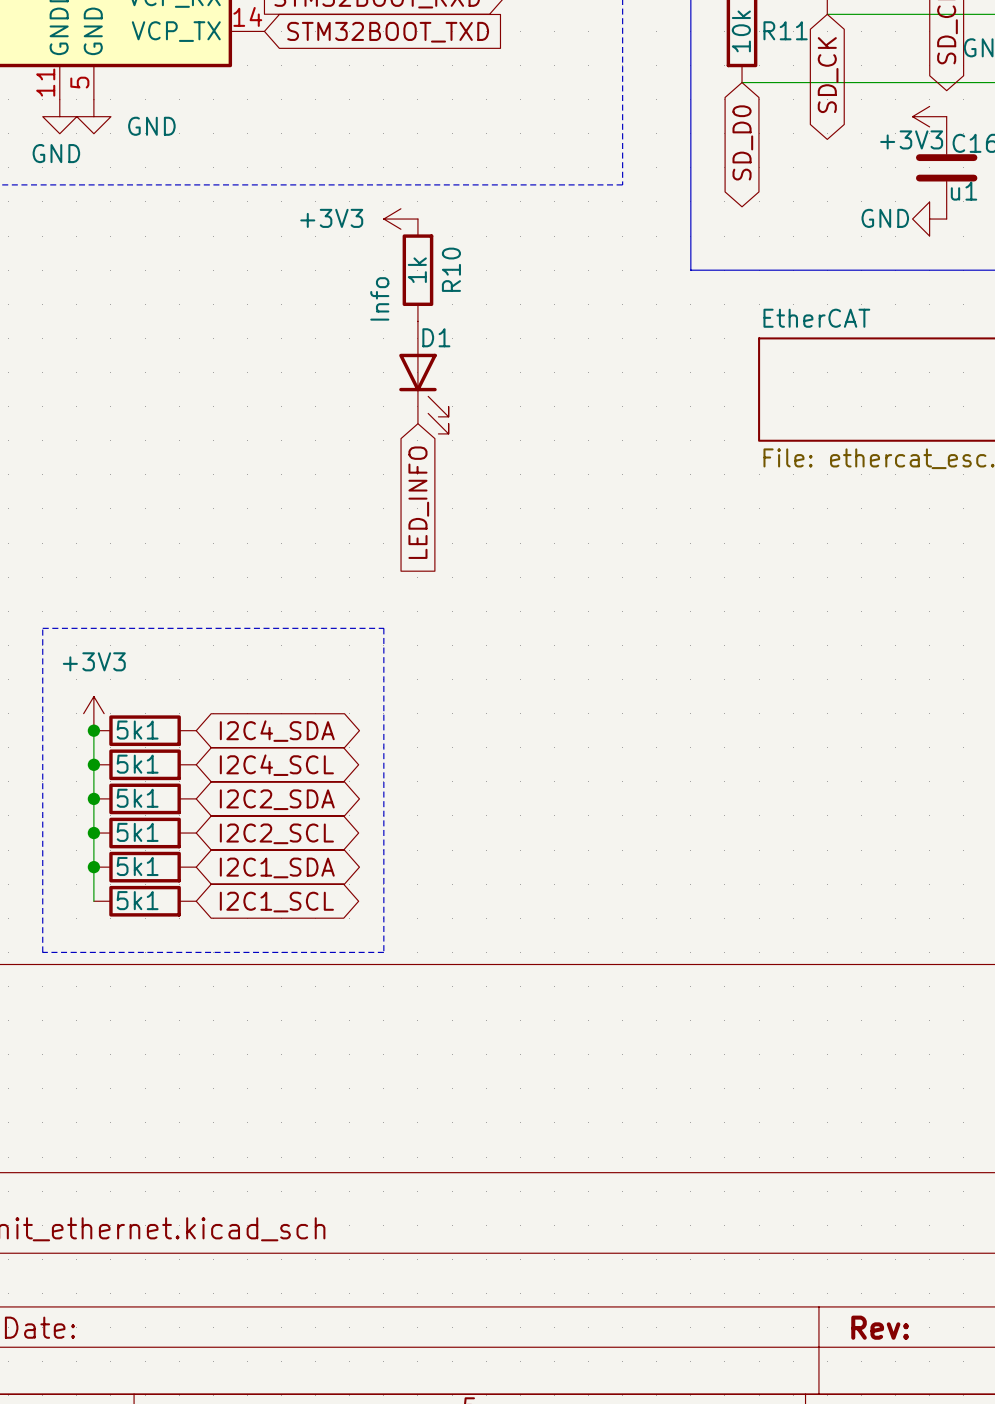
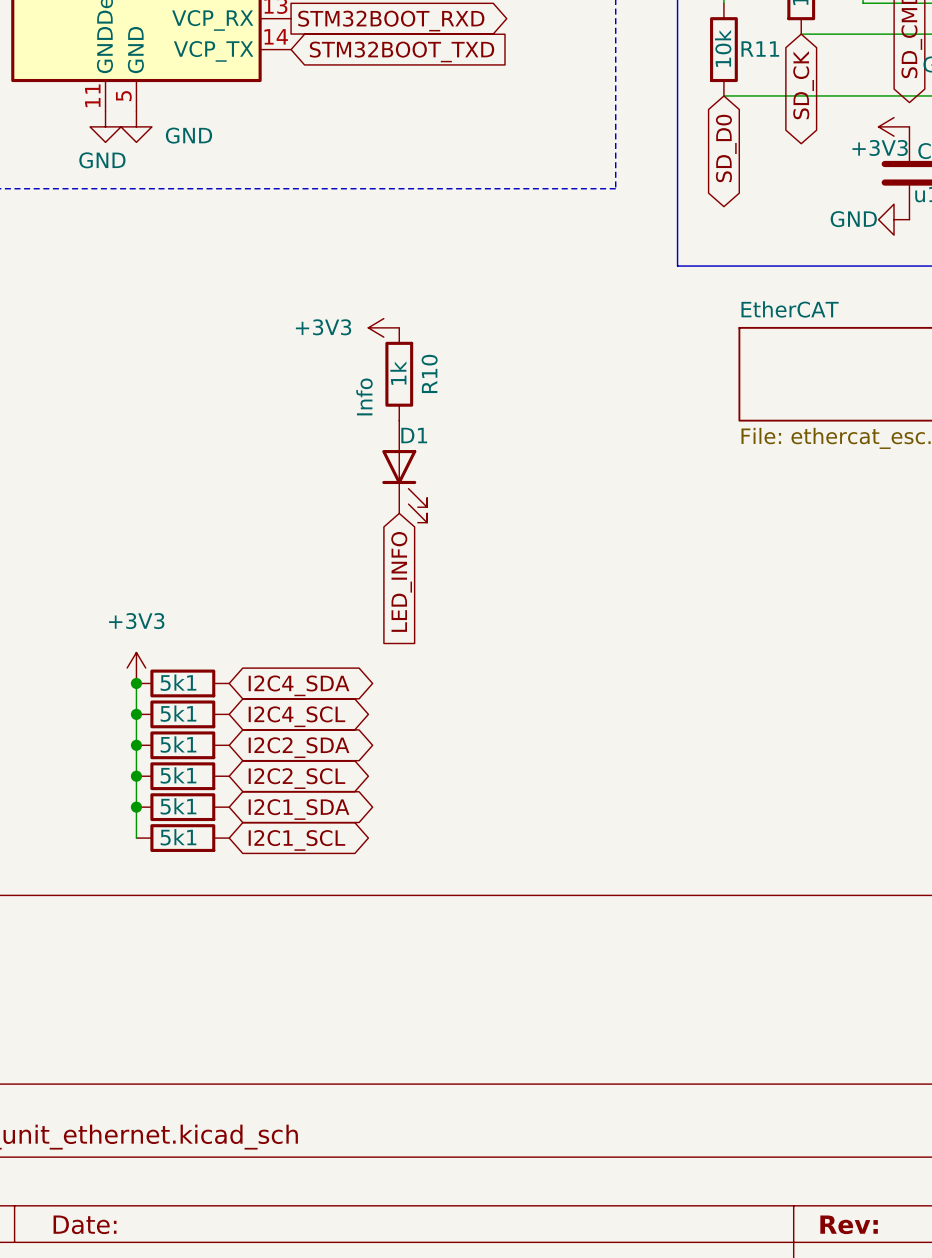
power symbol position: +3V3 (400, 219) -> +3V3 (383, 327)
R10 position: (417, 270) -> (399, 374)
D1 position: (423, 377) -> (404, 471)
global label position: LED_INFO (418, 502) -> LED_INFO (401, 581)
line: (42, 628) (383, 628) (383, 952) (42, 952) (42, 628) -> none

